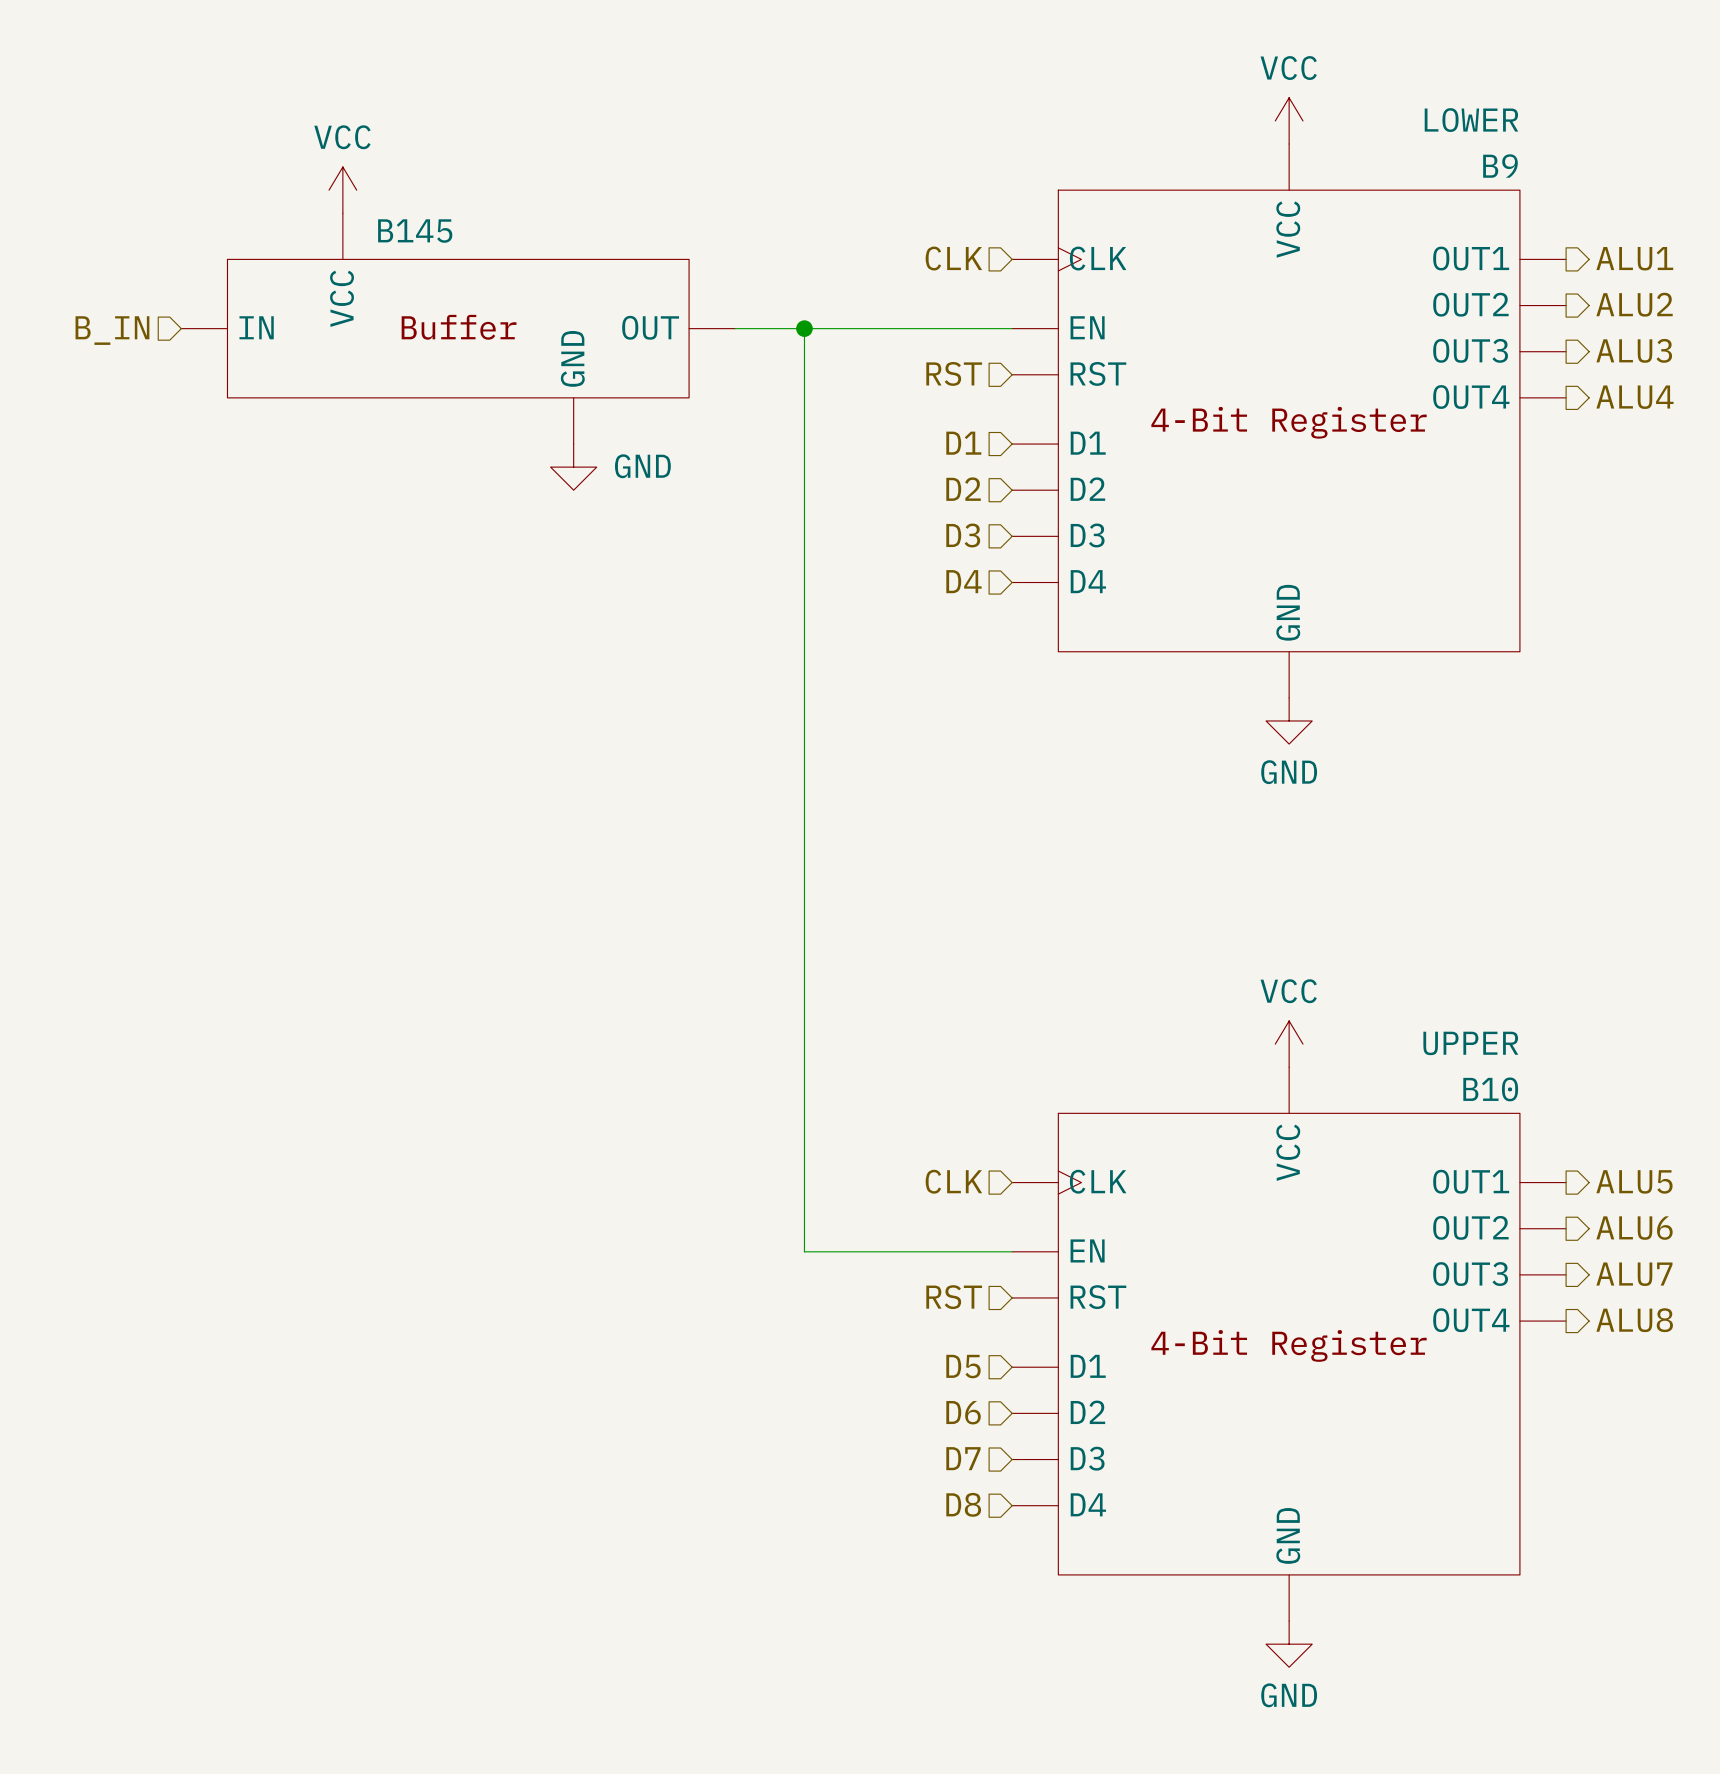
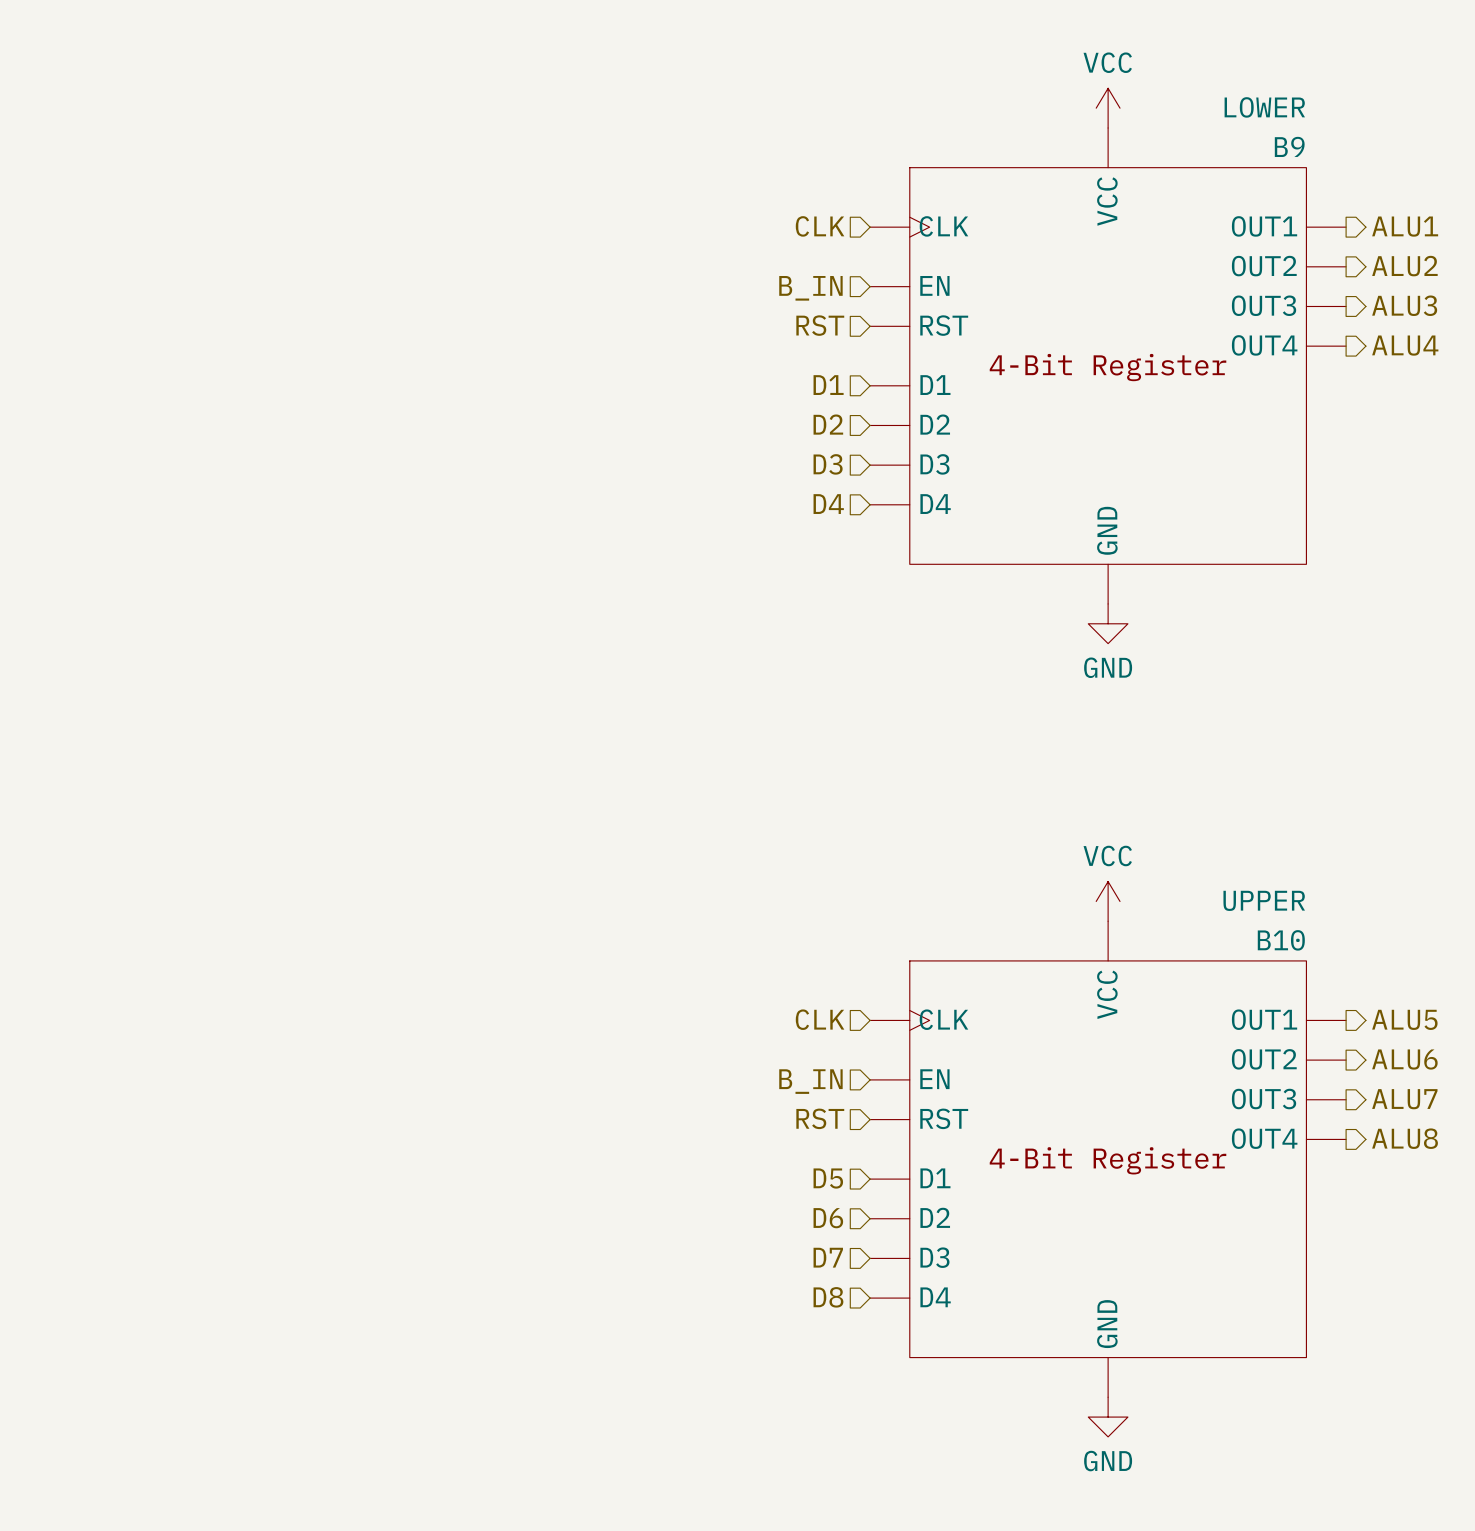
power symbol: VCC (342, 190) -> none
B145: (458, 328) -> none
wire: (735, 328) (1012, 328) -> none
wire: (804, 328) (804, 1251) (1012, 1251) -> none
junction: (804, 328) -> none
hierarchical label: B_IN (112, 330) -> none
hierarchical label: none -> B_IN (810, 288)
power symbol: GND (573, 467) -> none
hierarchical label: none -> B_IN (810, 1081)

